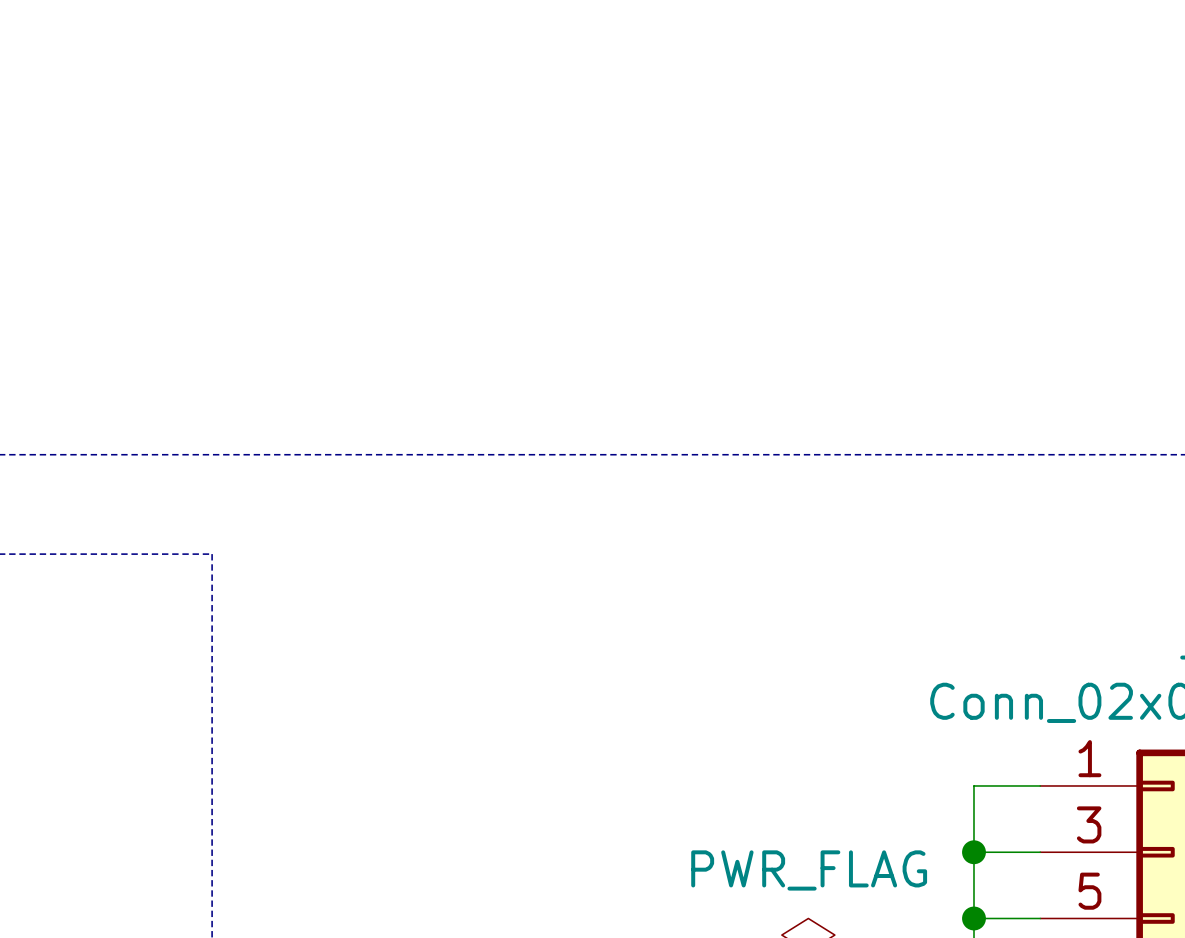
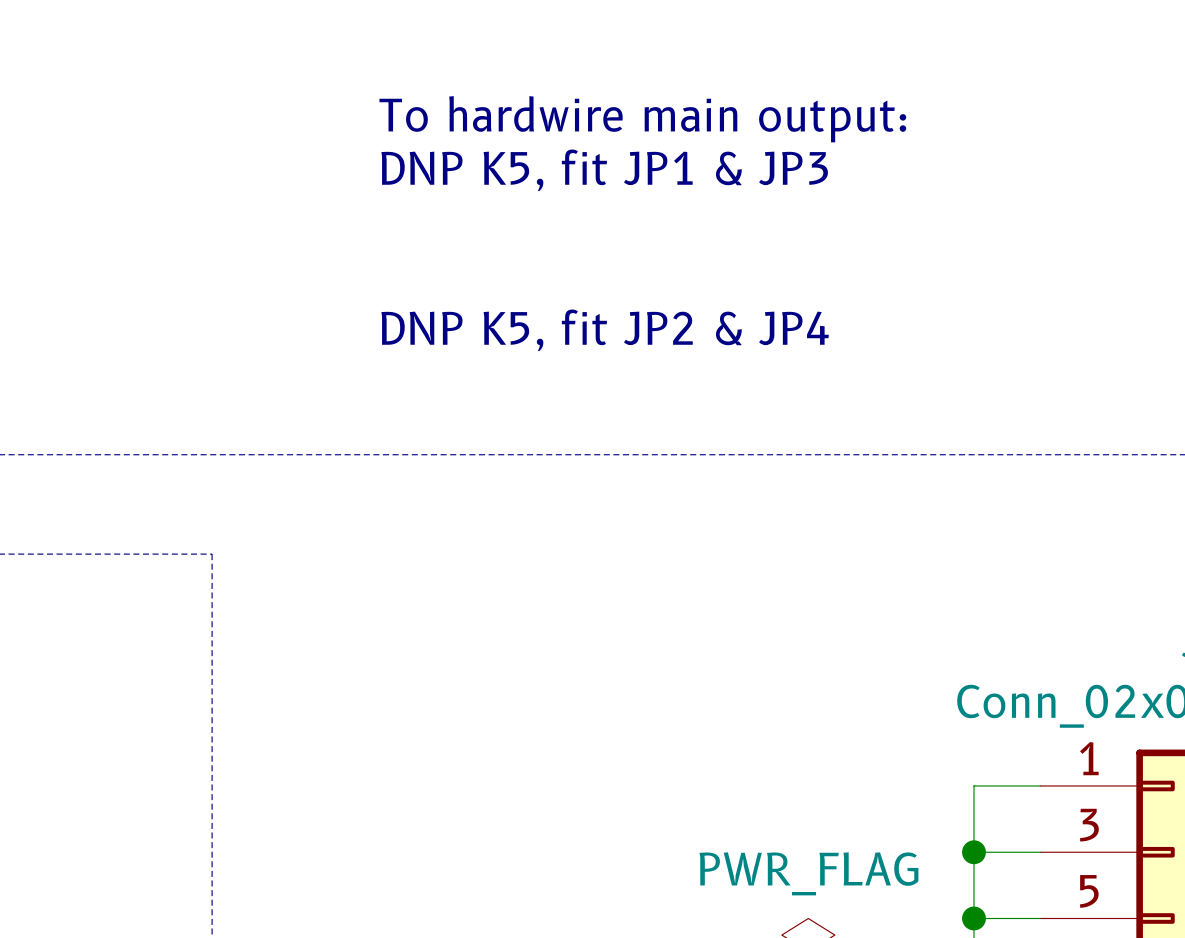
text: none -> To hardwire main output: (642, 119)
text: none -> DNP K5, fit JP1 & JP3 (604, 170)
text: none -> DNP K5, fit JP2 & JP4 (605, 330)

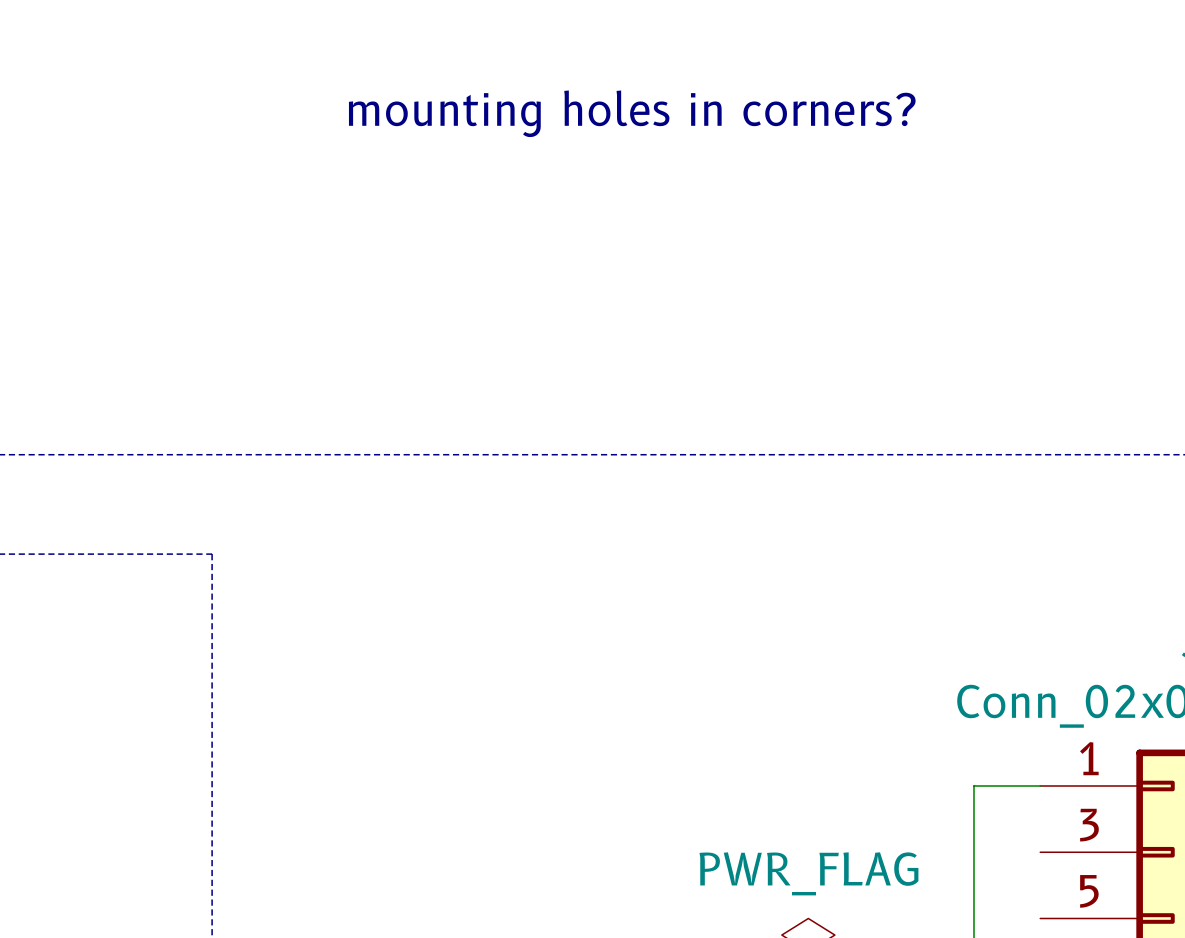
text: none -> mounting holes in corners? (632, 113)
text: To hardwire main output: (642, 119) -> none
text: DNP K5, fit JP1 & JP3 (604, 170) -> none
text: DNP K5, fit JP2 & JP4 (605, 330) -> none
wire: (973, 852) (1040, 852) -> none
junction: (973, 852) -> none
wire: (973, 918) (1040, 918) -> none
junction: (973, 918) -> none

